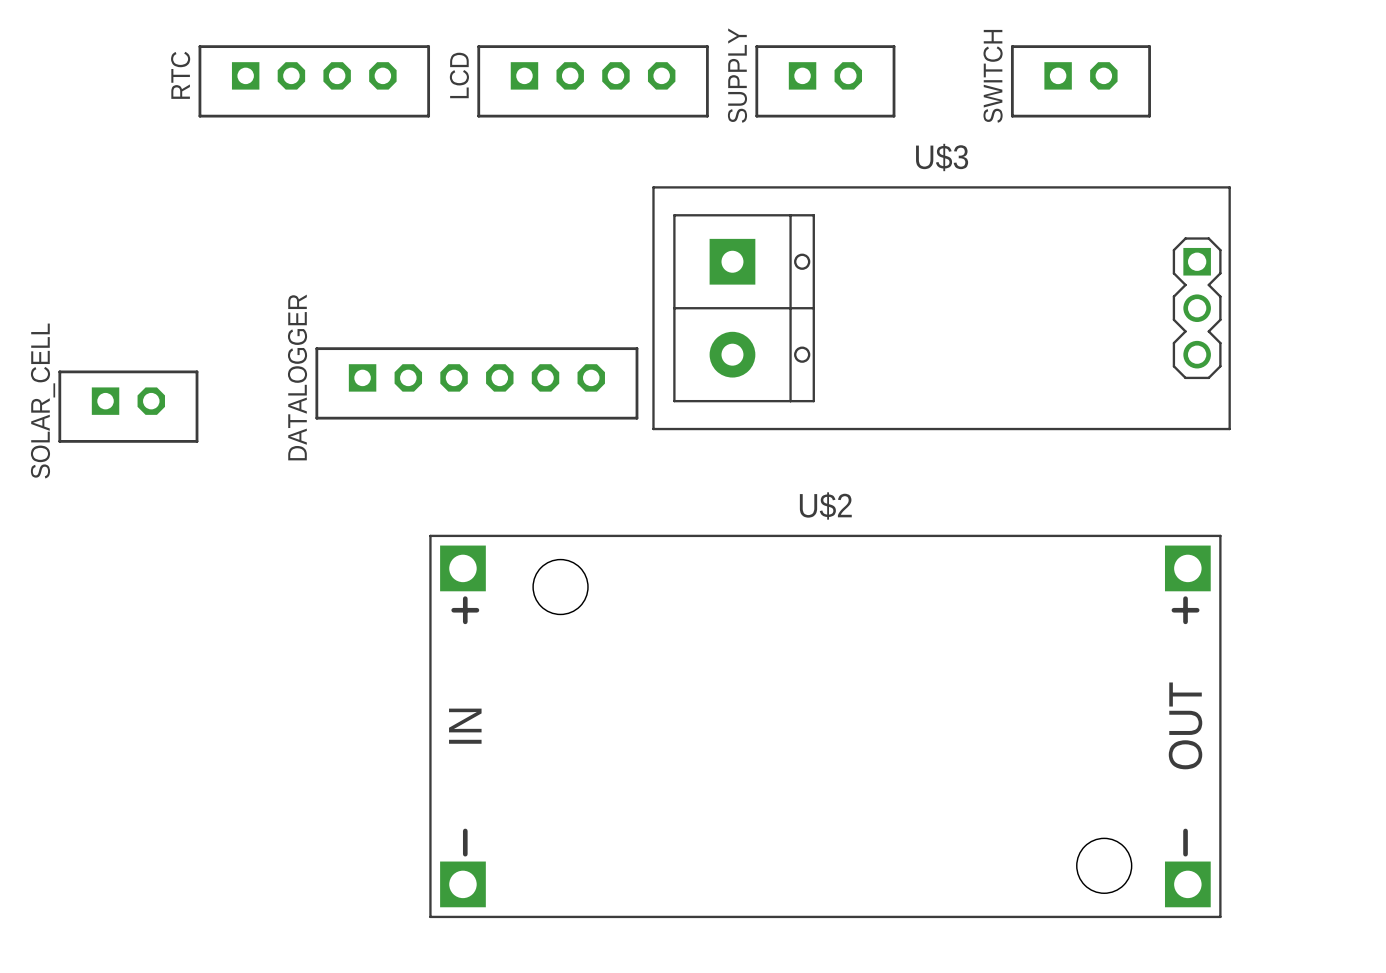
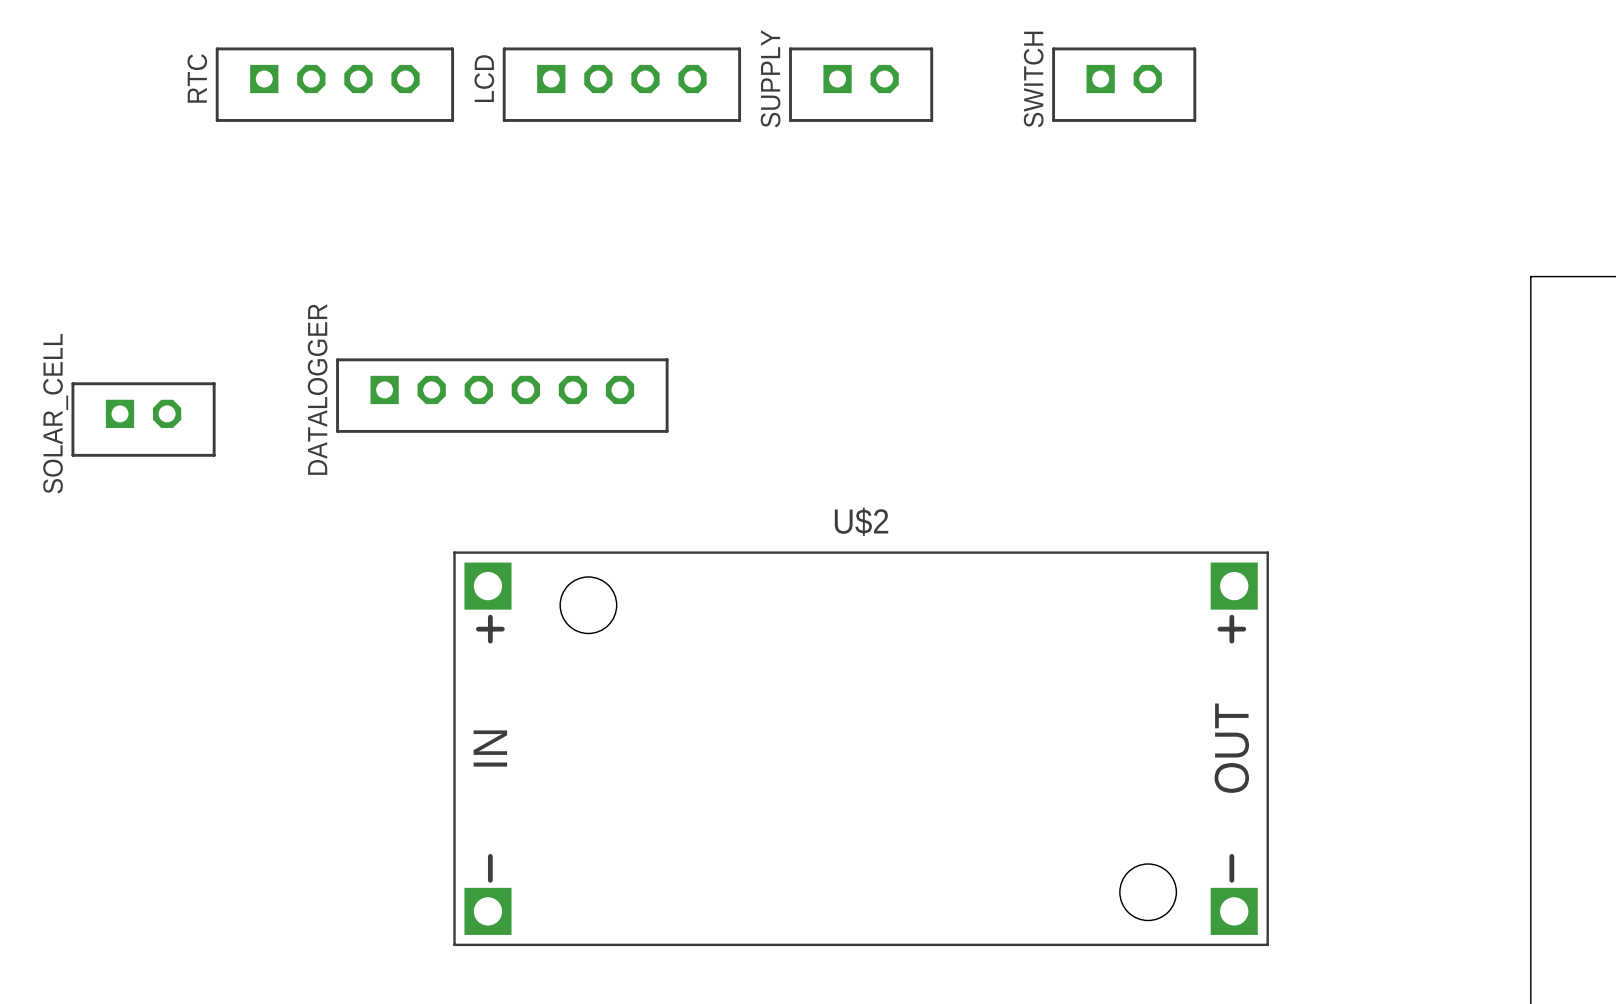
U$3: (941, 308) -> none

